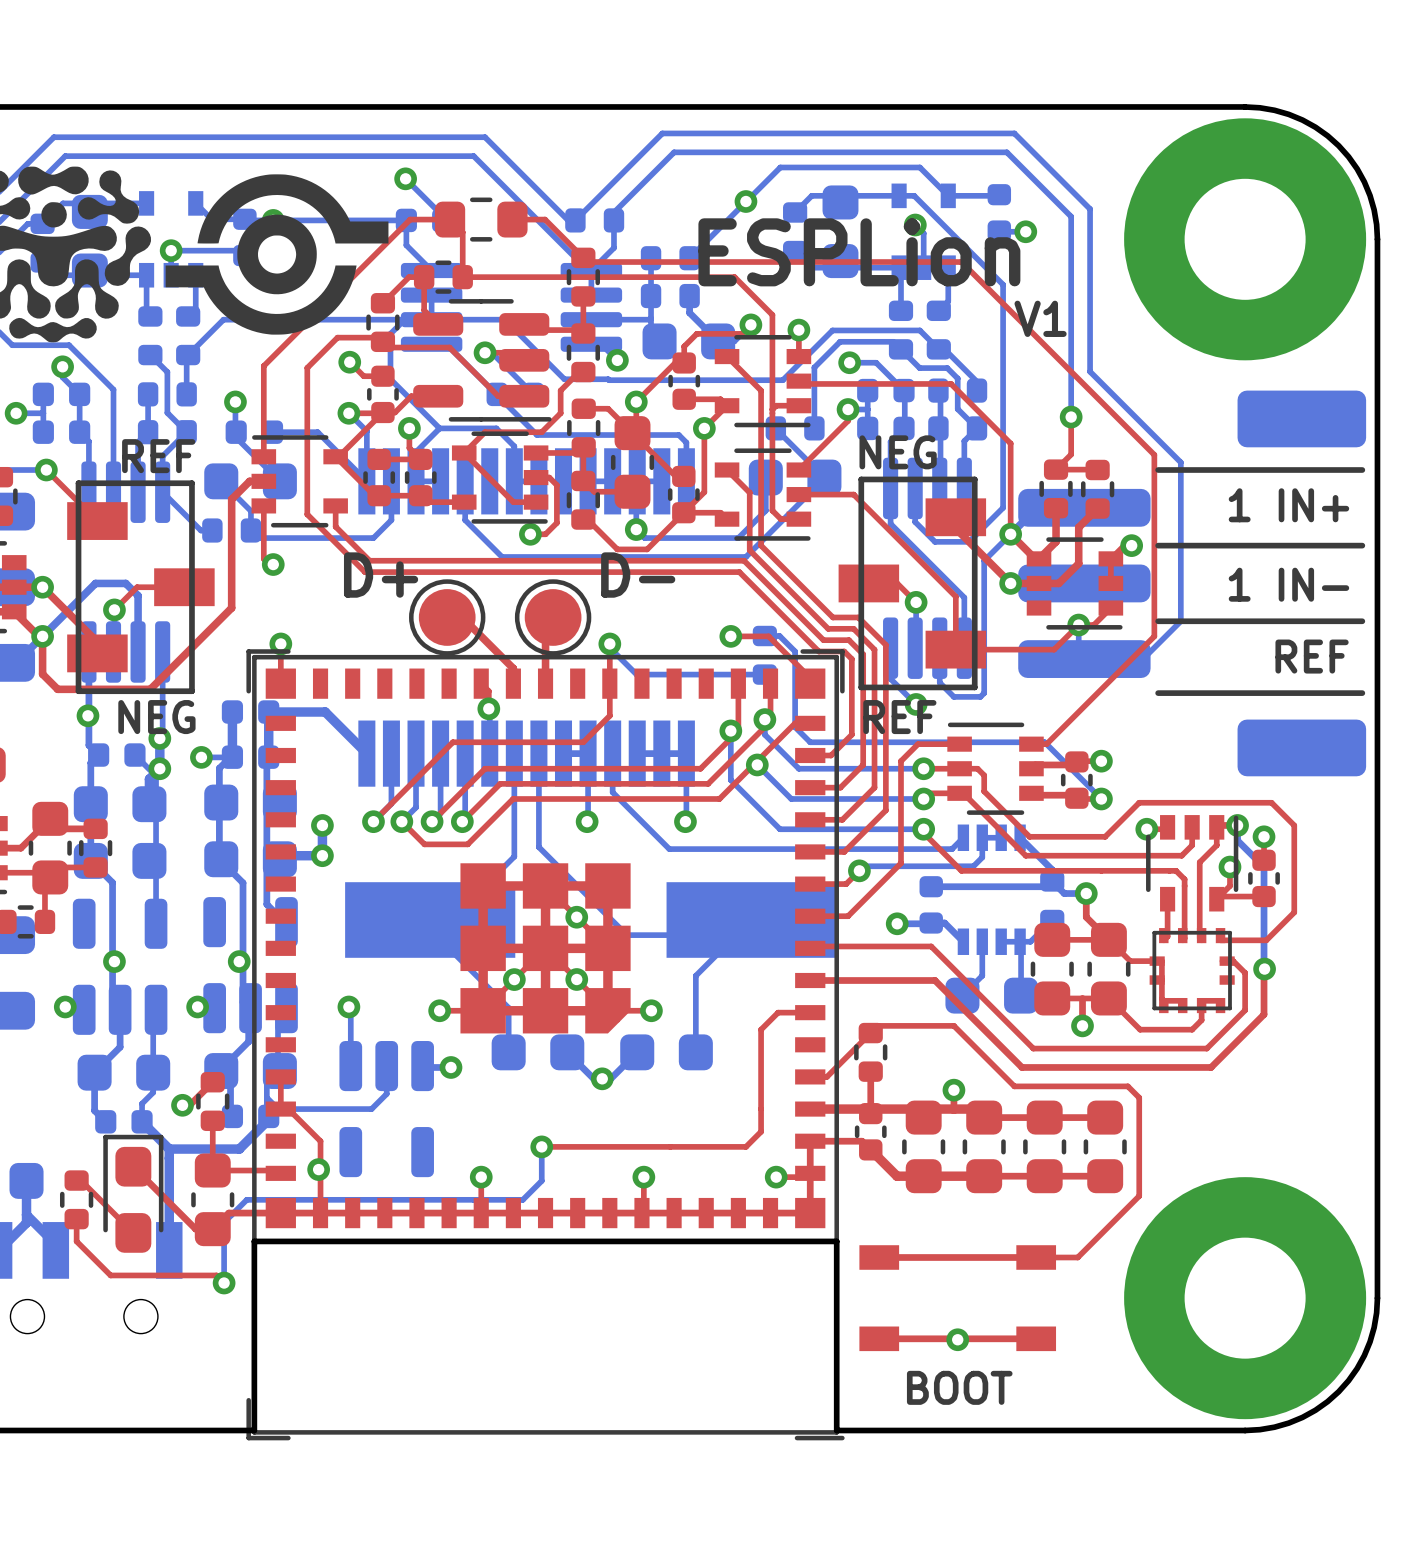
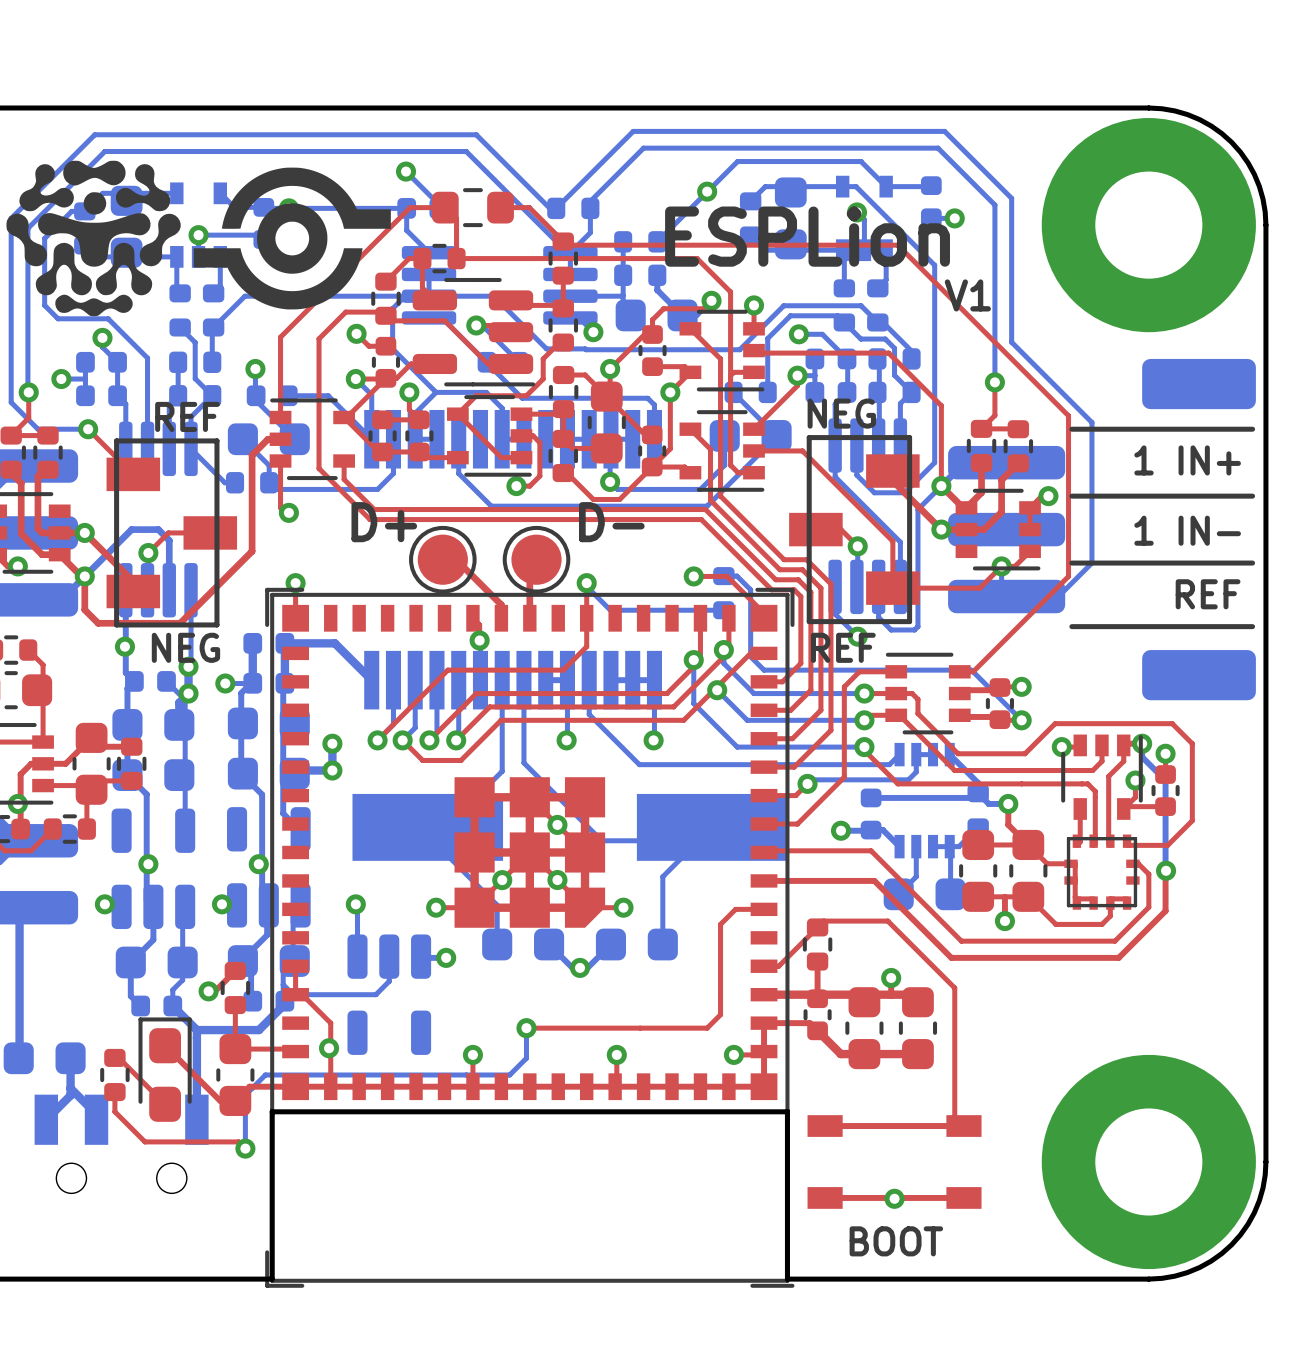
top track: (950, 1025) (953, 1025) (1014, 1086) (1127, 1086) (1139, 1097) (1139, 1196) (1077, 1257) (1036, 1257) -> (887, 921) (954, 988) (954, 1116) (963, 1126)
top track: (984, 1117) (1105, 1117) -> none
part: (1044, 1146) -> none
part: (1105, 1146) -> none
top track: (984, 1176) (1105, 1176) -> none

